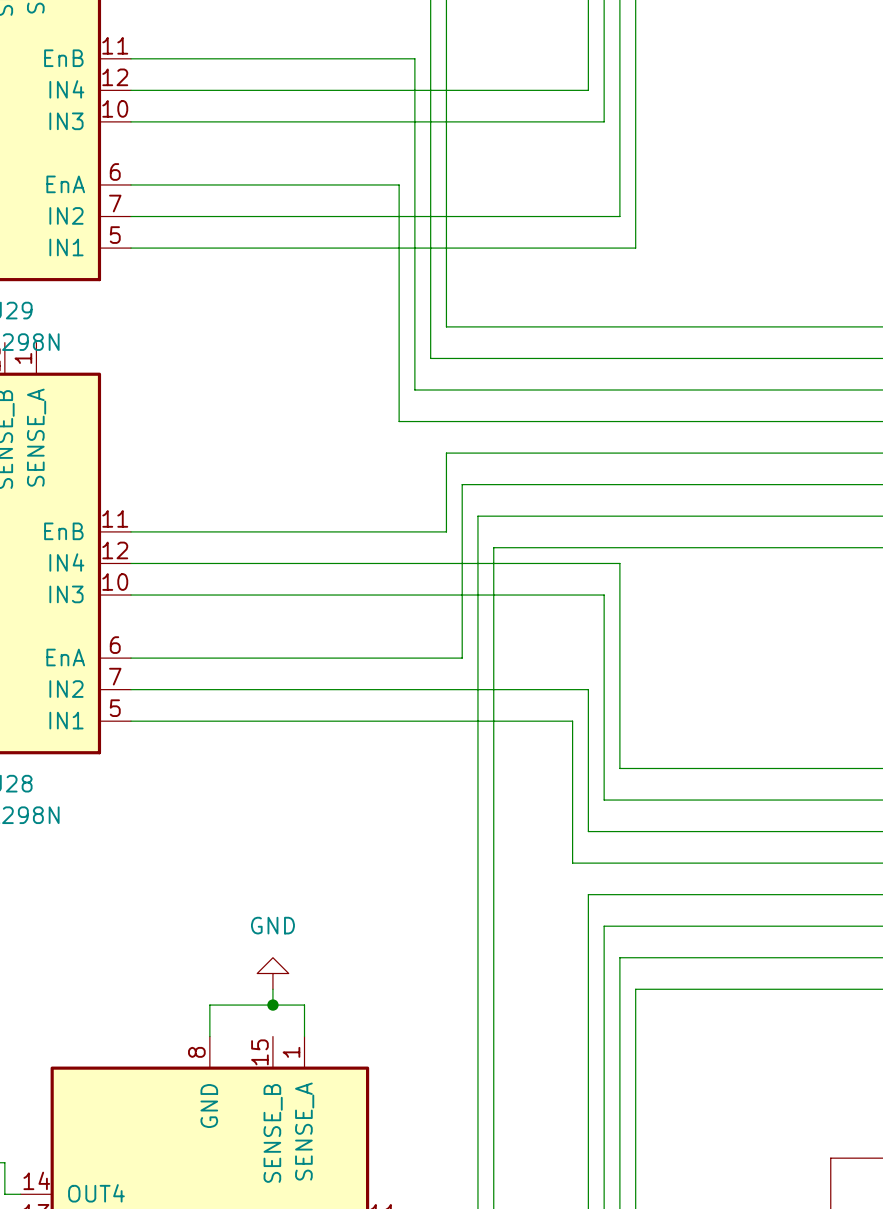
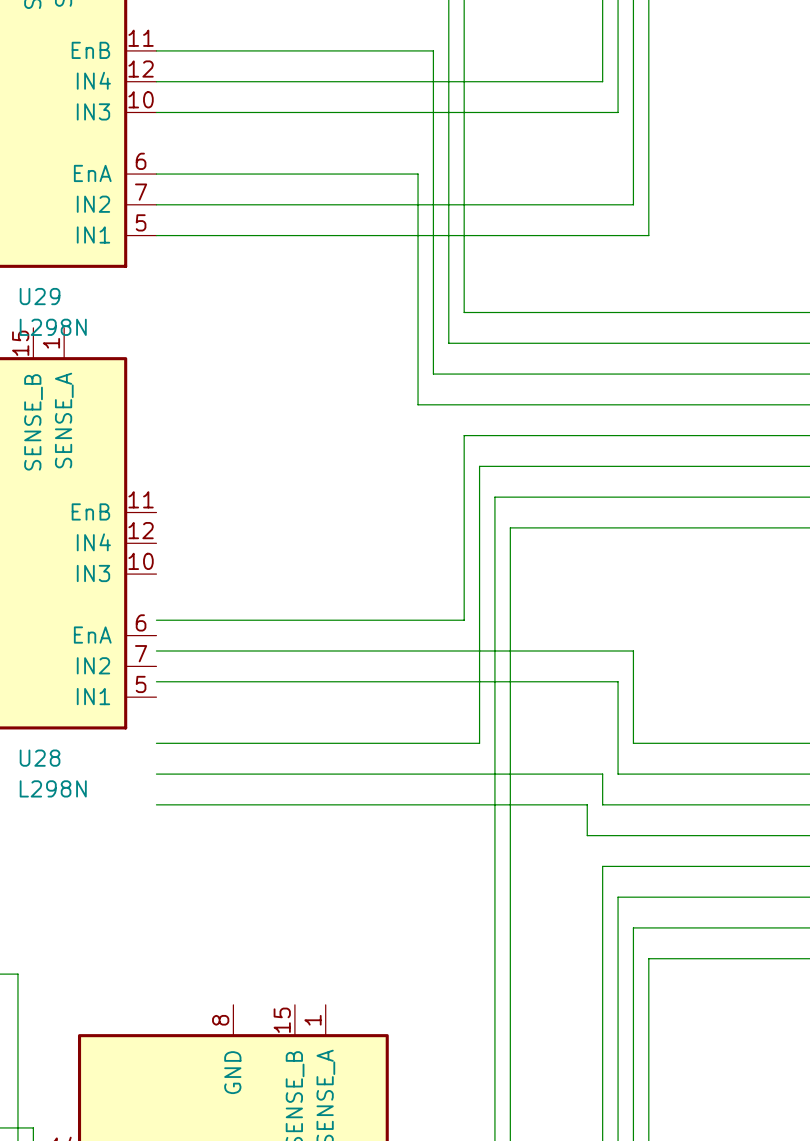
wire: (131, 531) (446, 531) -> (156, 620) (464, 620) (464, 512)
wire: (131, 563) (619, 563) (619, 673) -> (156, 650) (633, 650)
wire: (131, 595) (604, 595) (604, 705) -> (156, 681) (618, 681)
wire: (131, 658) (462, 658) -> (156, 743) (479, 743) (479, 635)
wire: (131, 689) (588, 689) (588, 800) -> (156, 774) (602, 774)
wire: (131, 721) (572, 721) (572, 831) -> (156, 804) (587, 804)
power symbol: GND (272, 973) -> none
wire: (272, 989) (272, 1005) -> none
junction: (272, 1005) -> none
wire: (209, 1036) (209, 1005) (304, 1005) (304, 1036) -> none

